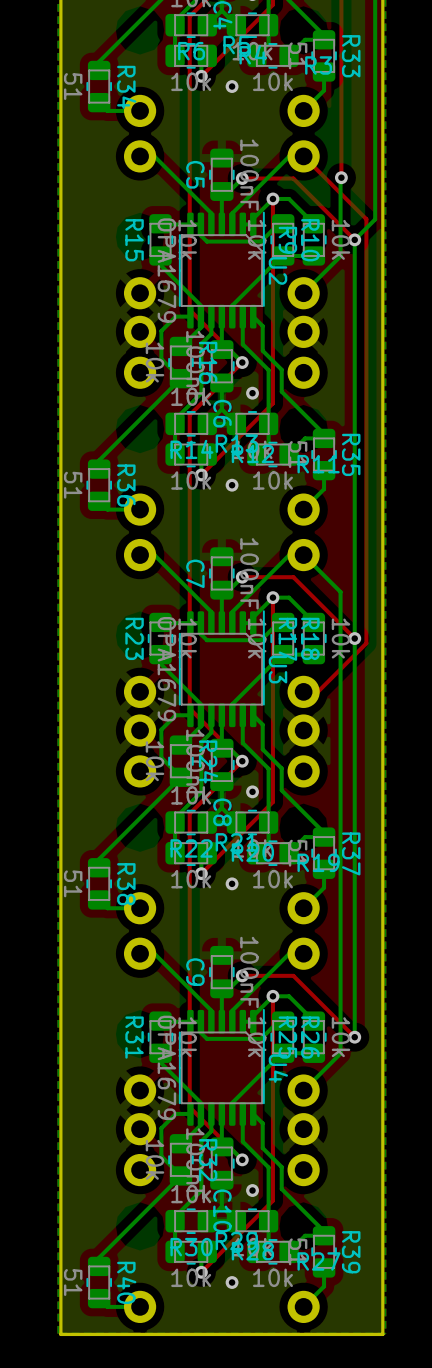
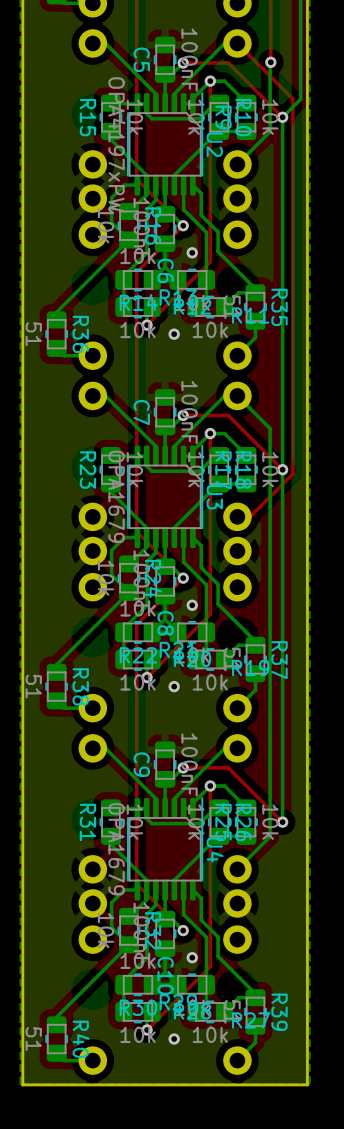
U2 value: OPA1679 (166, 270) -> OPA4197xPW (116, 144)

